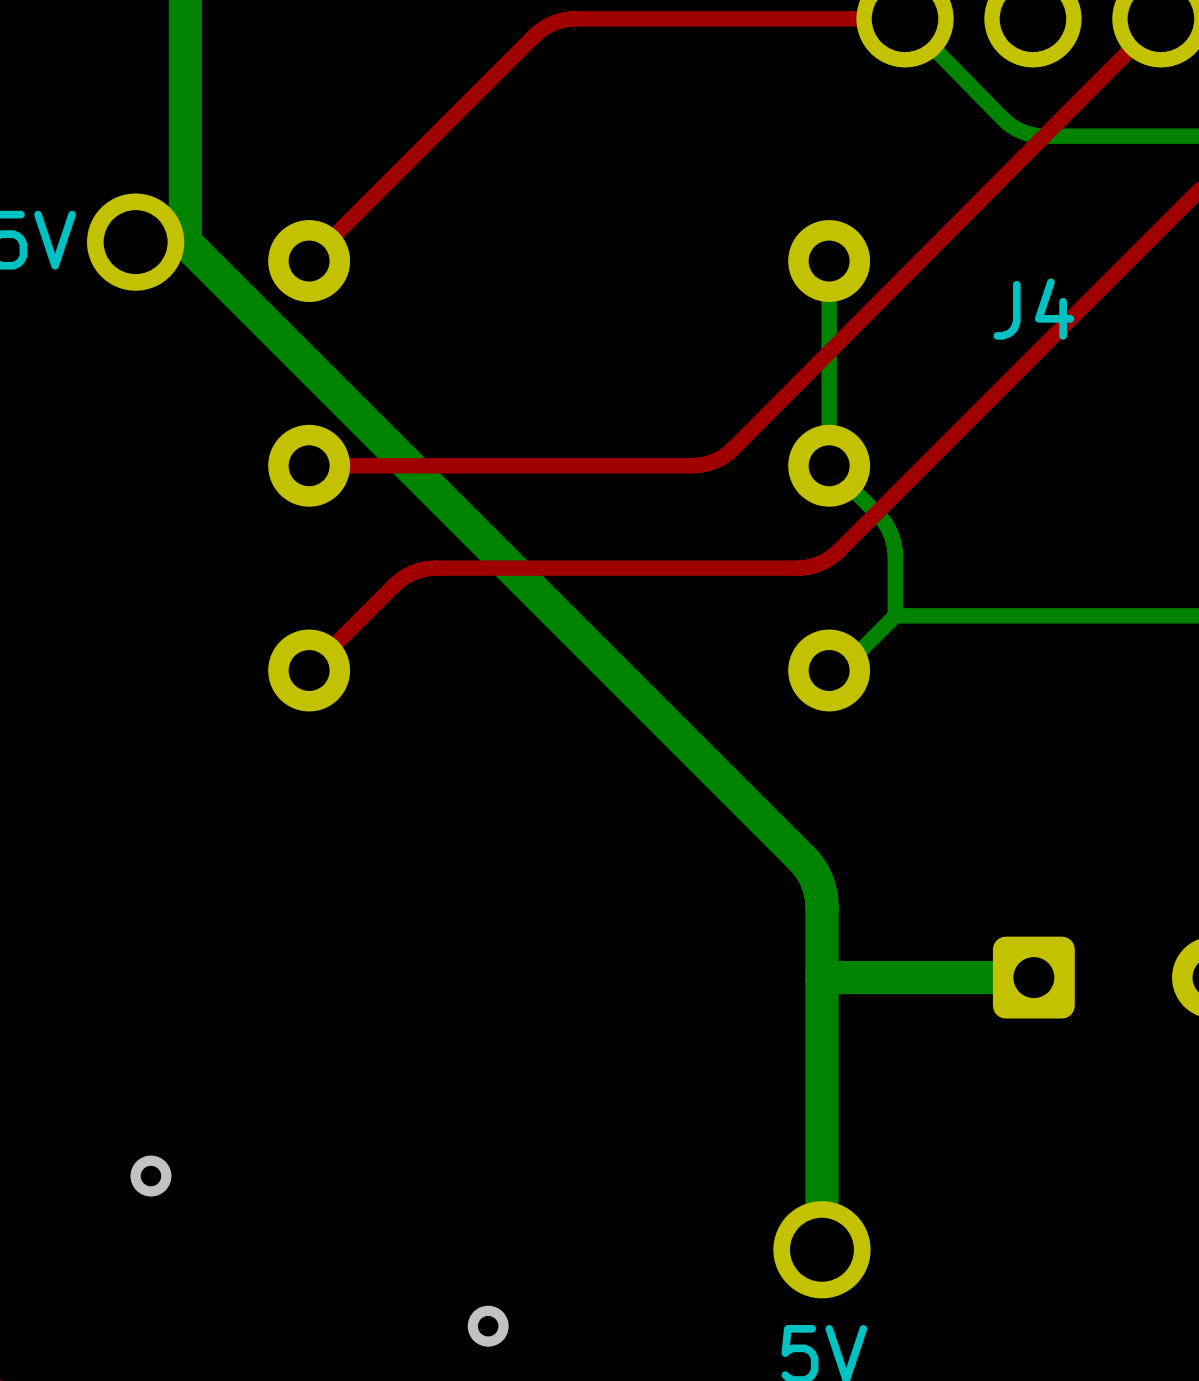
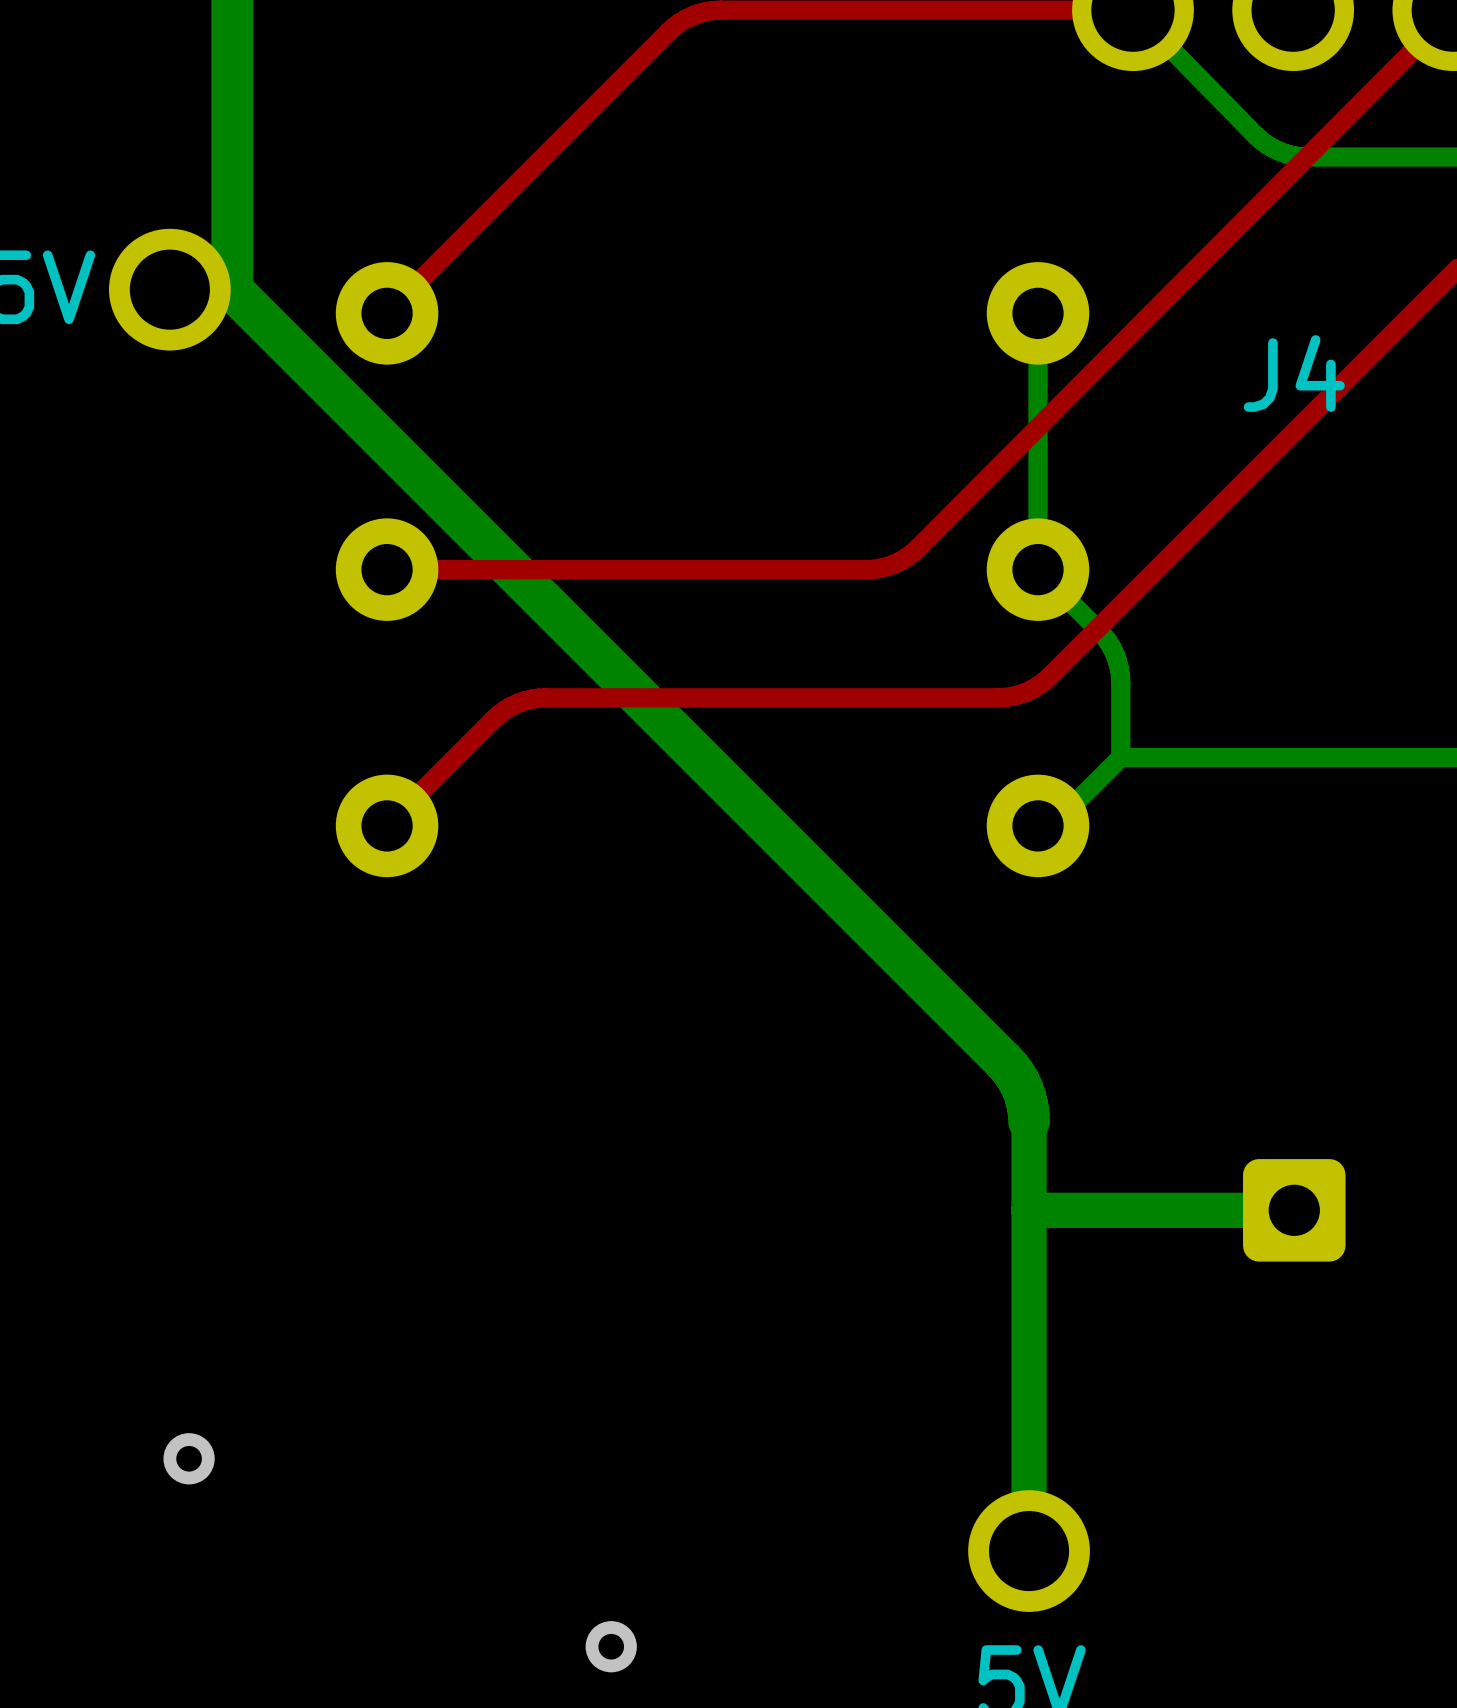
bottom track width: thick (821, 906) (821, 1249) -> thin (1029, 1121) (1029, 1551)
bottom track width: thick (821, 977) (1033, 977) -> thin (1029, 1210) (1294, 1210)

